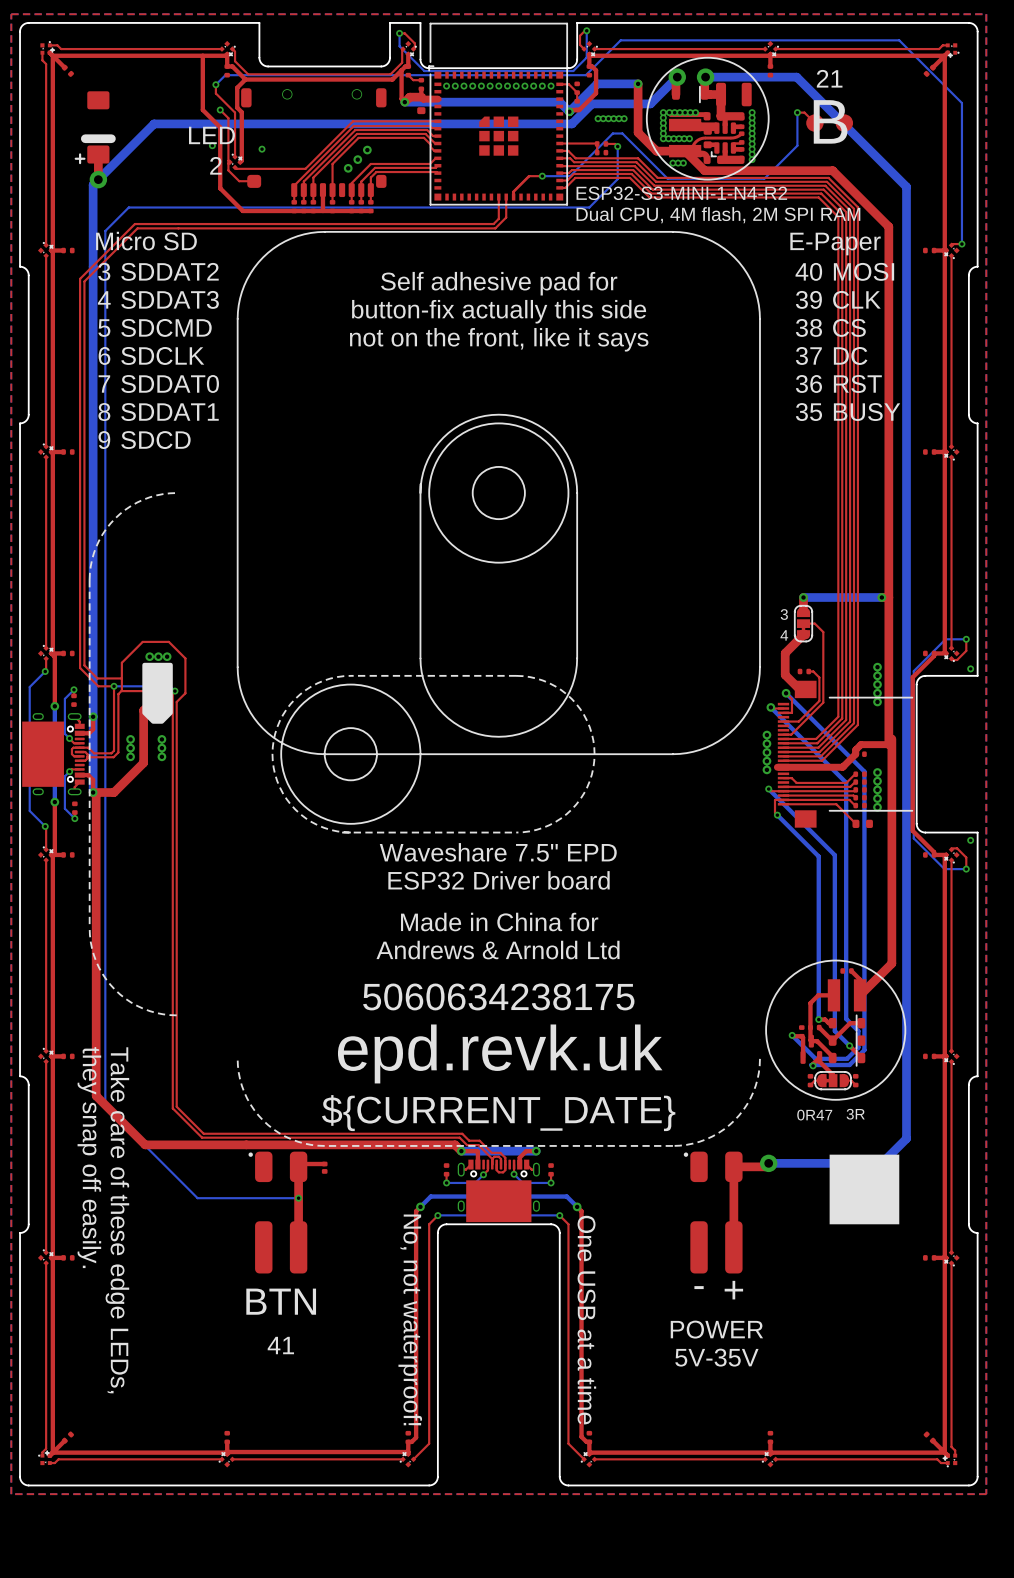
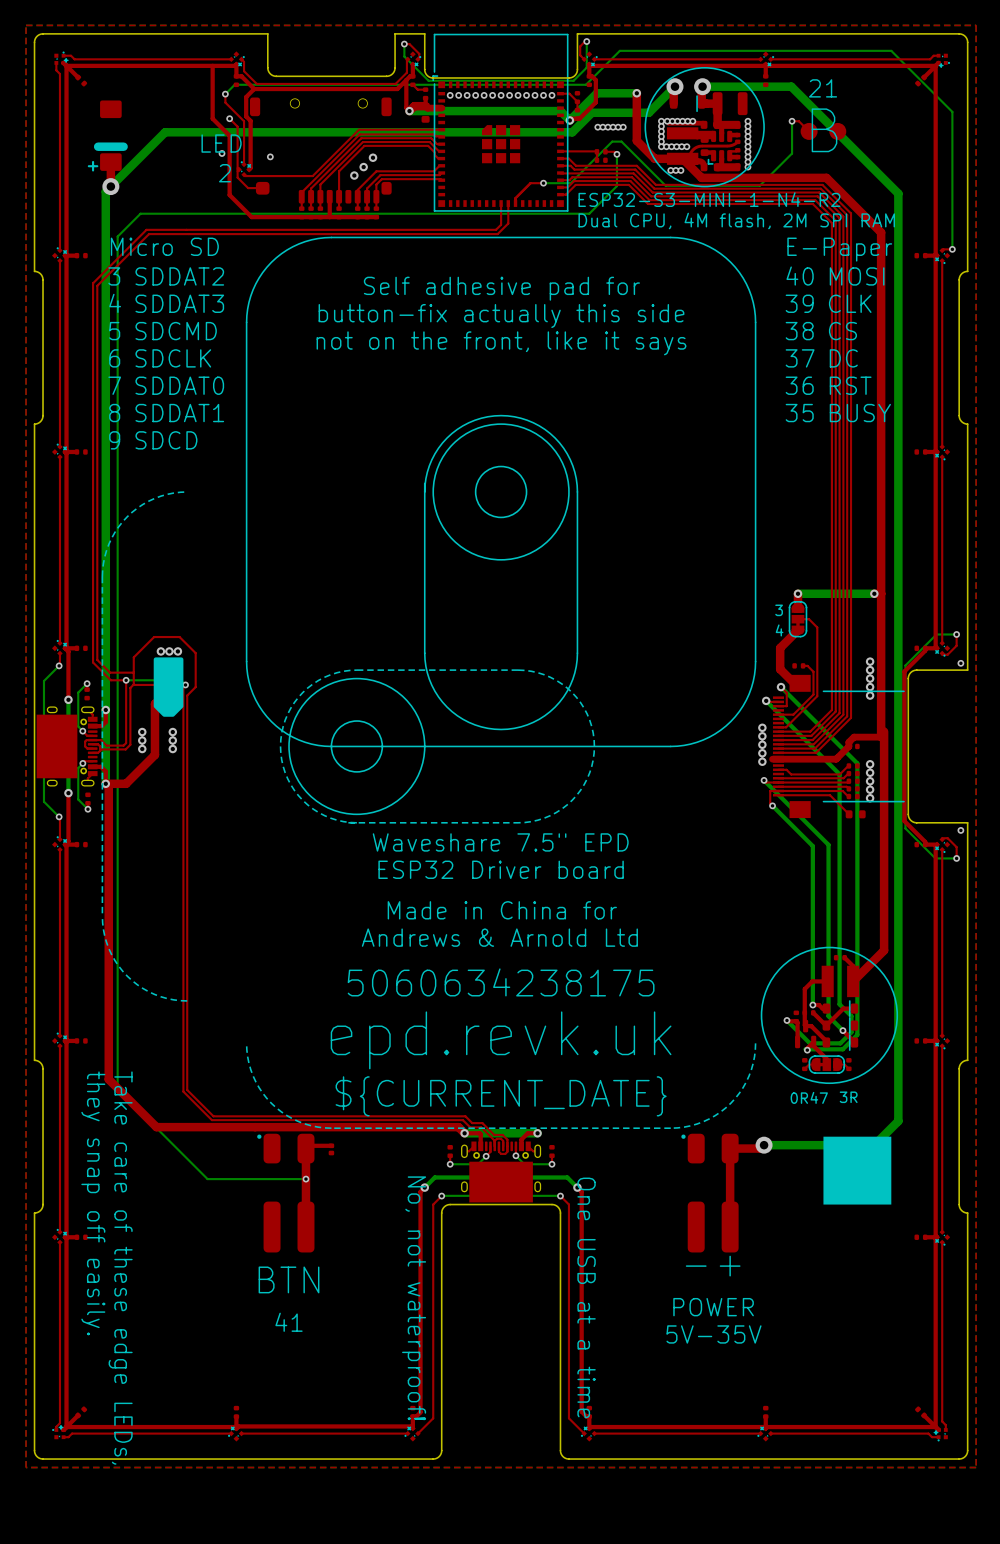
text position: they snap off easily. (89, 1157) -> they snap off easily. (93, 1203)
text position: Take care of these edge LEDs, (117, 1220) -> Take care of these edge LEDs, (120, 1268)

